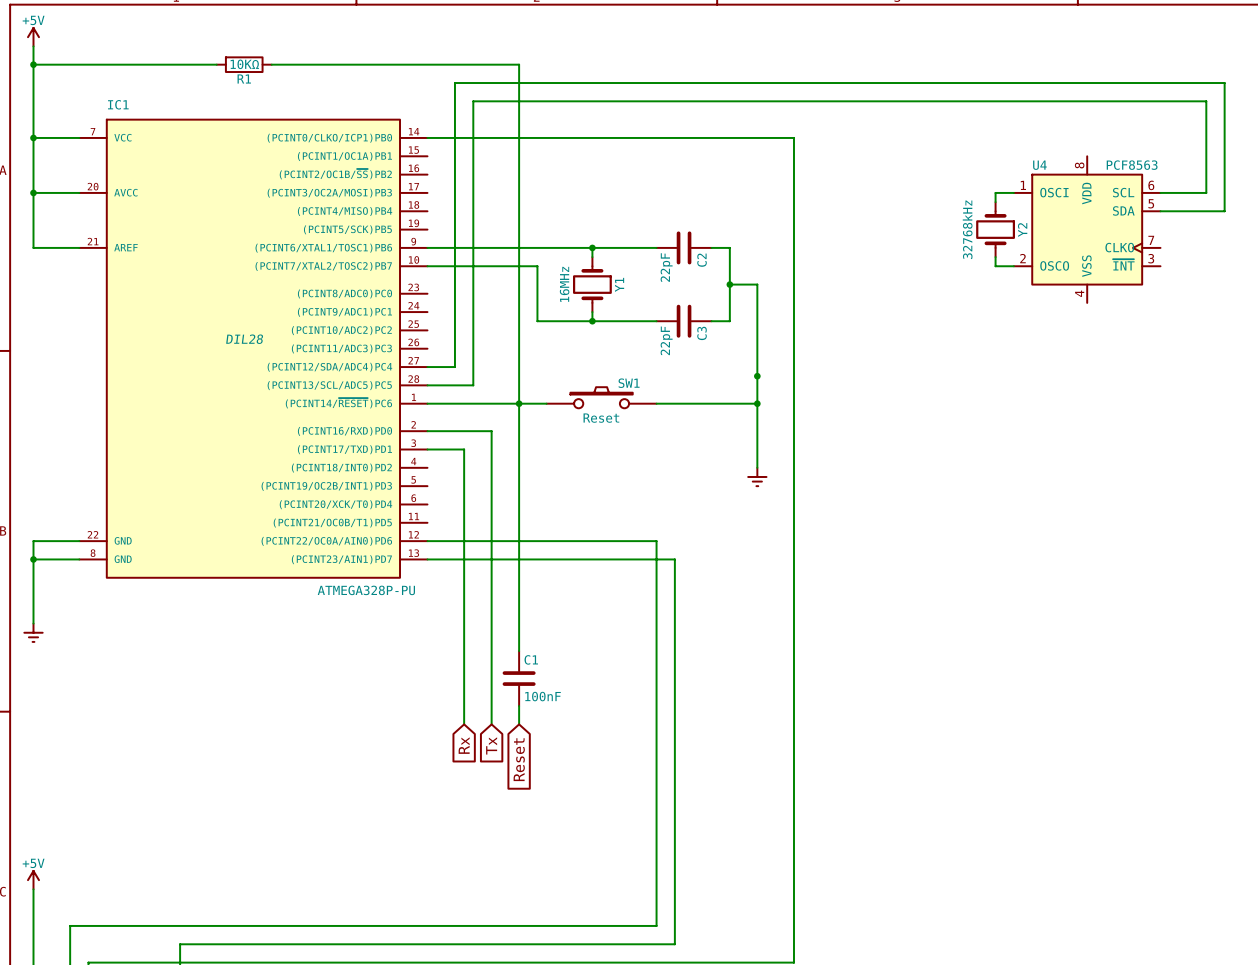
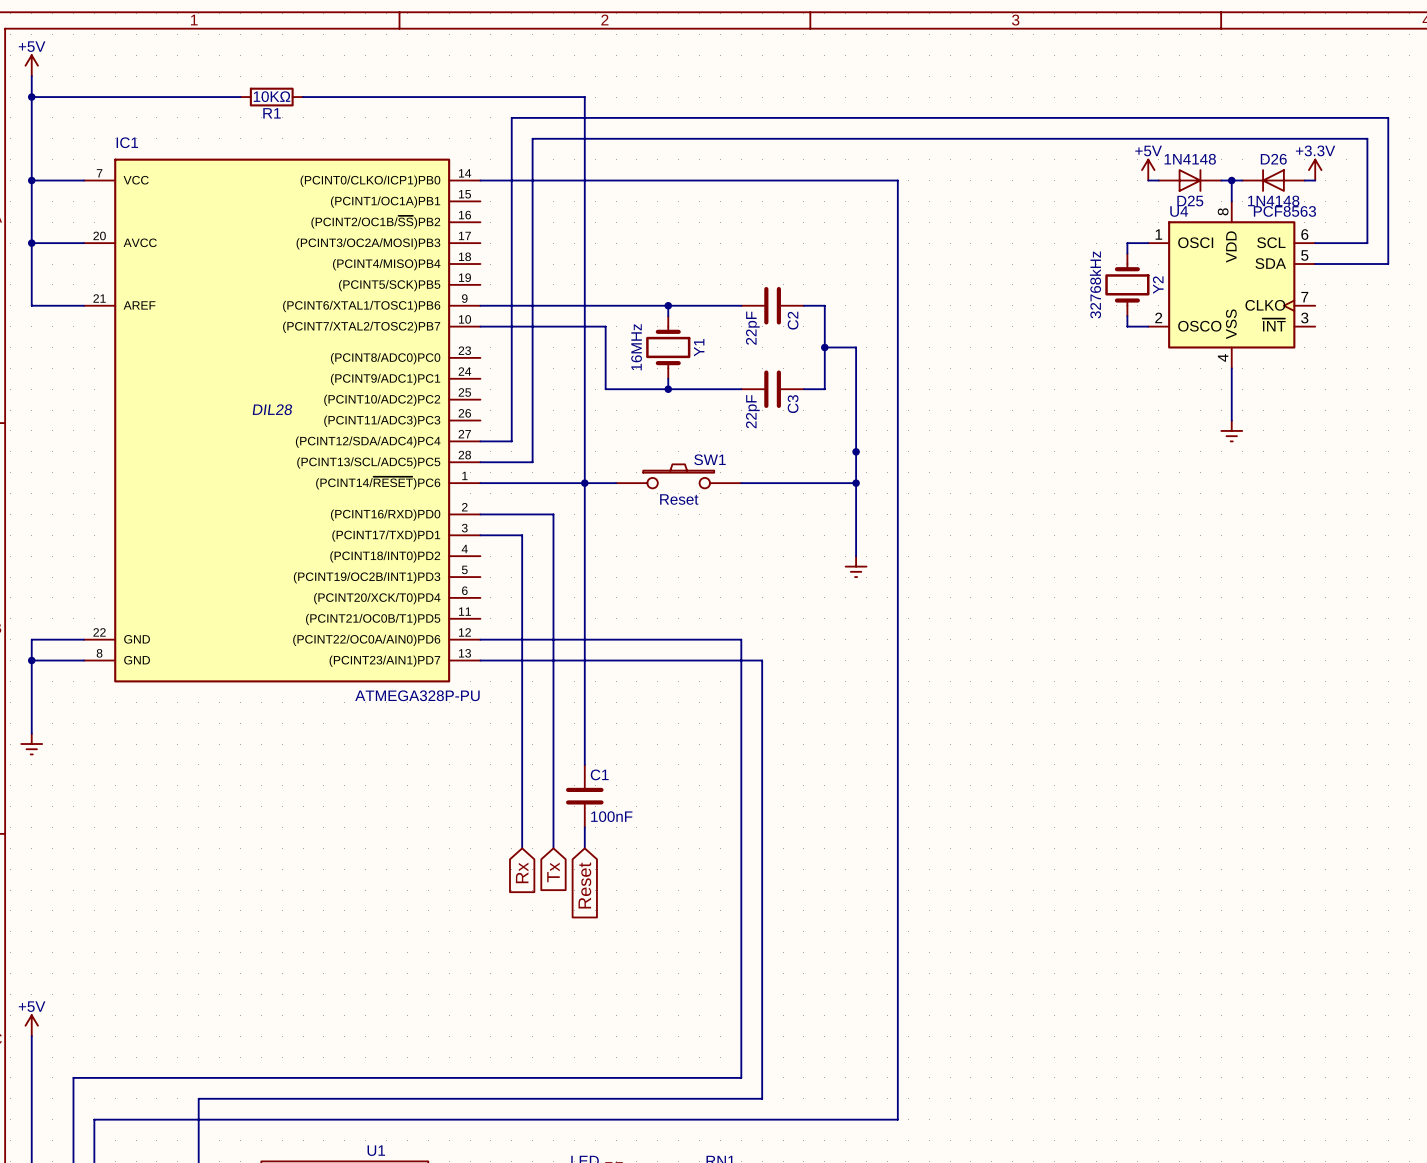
power symbol: none -> +5V (1148, 170)
power symbol: none -> +3.3V (1315, 170)
wire: none -> (1148, 180) (1158, 180)
D25: none -> 1N4148 (1190, 180)
wire: none -> (1221, 180) (1242, 180)
wire: none -> (1231, 180) (1231, 201)
junction: none -> (1231, 180)
D26: none -> 1N4148 (1273, 180)
wire: none -> (1304, 180) (1315, 180)
wire: none -> (1231, 368) (1231, 420)
power symbol: none -> (1231, 430)

